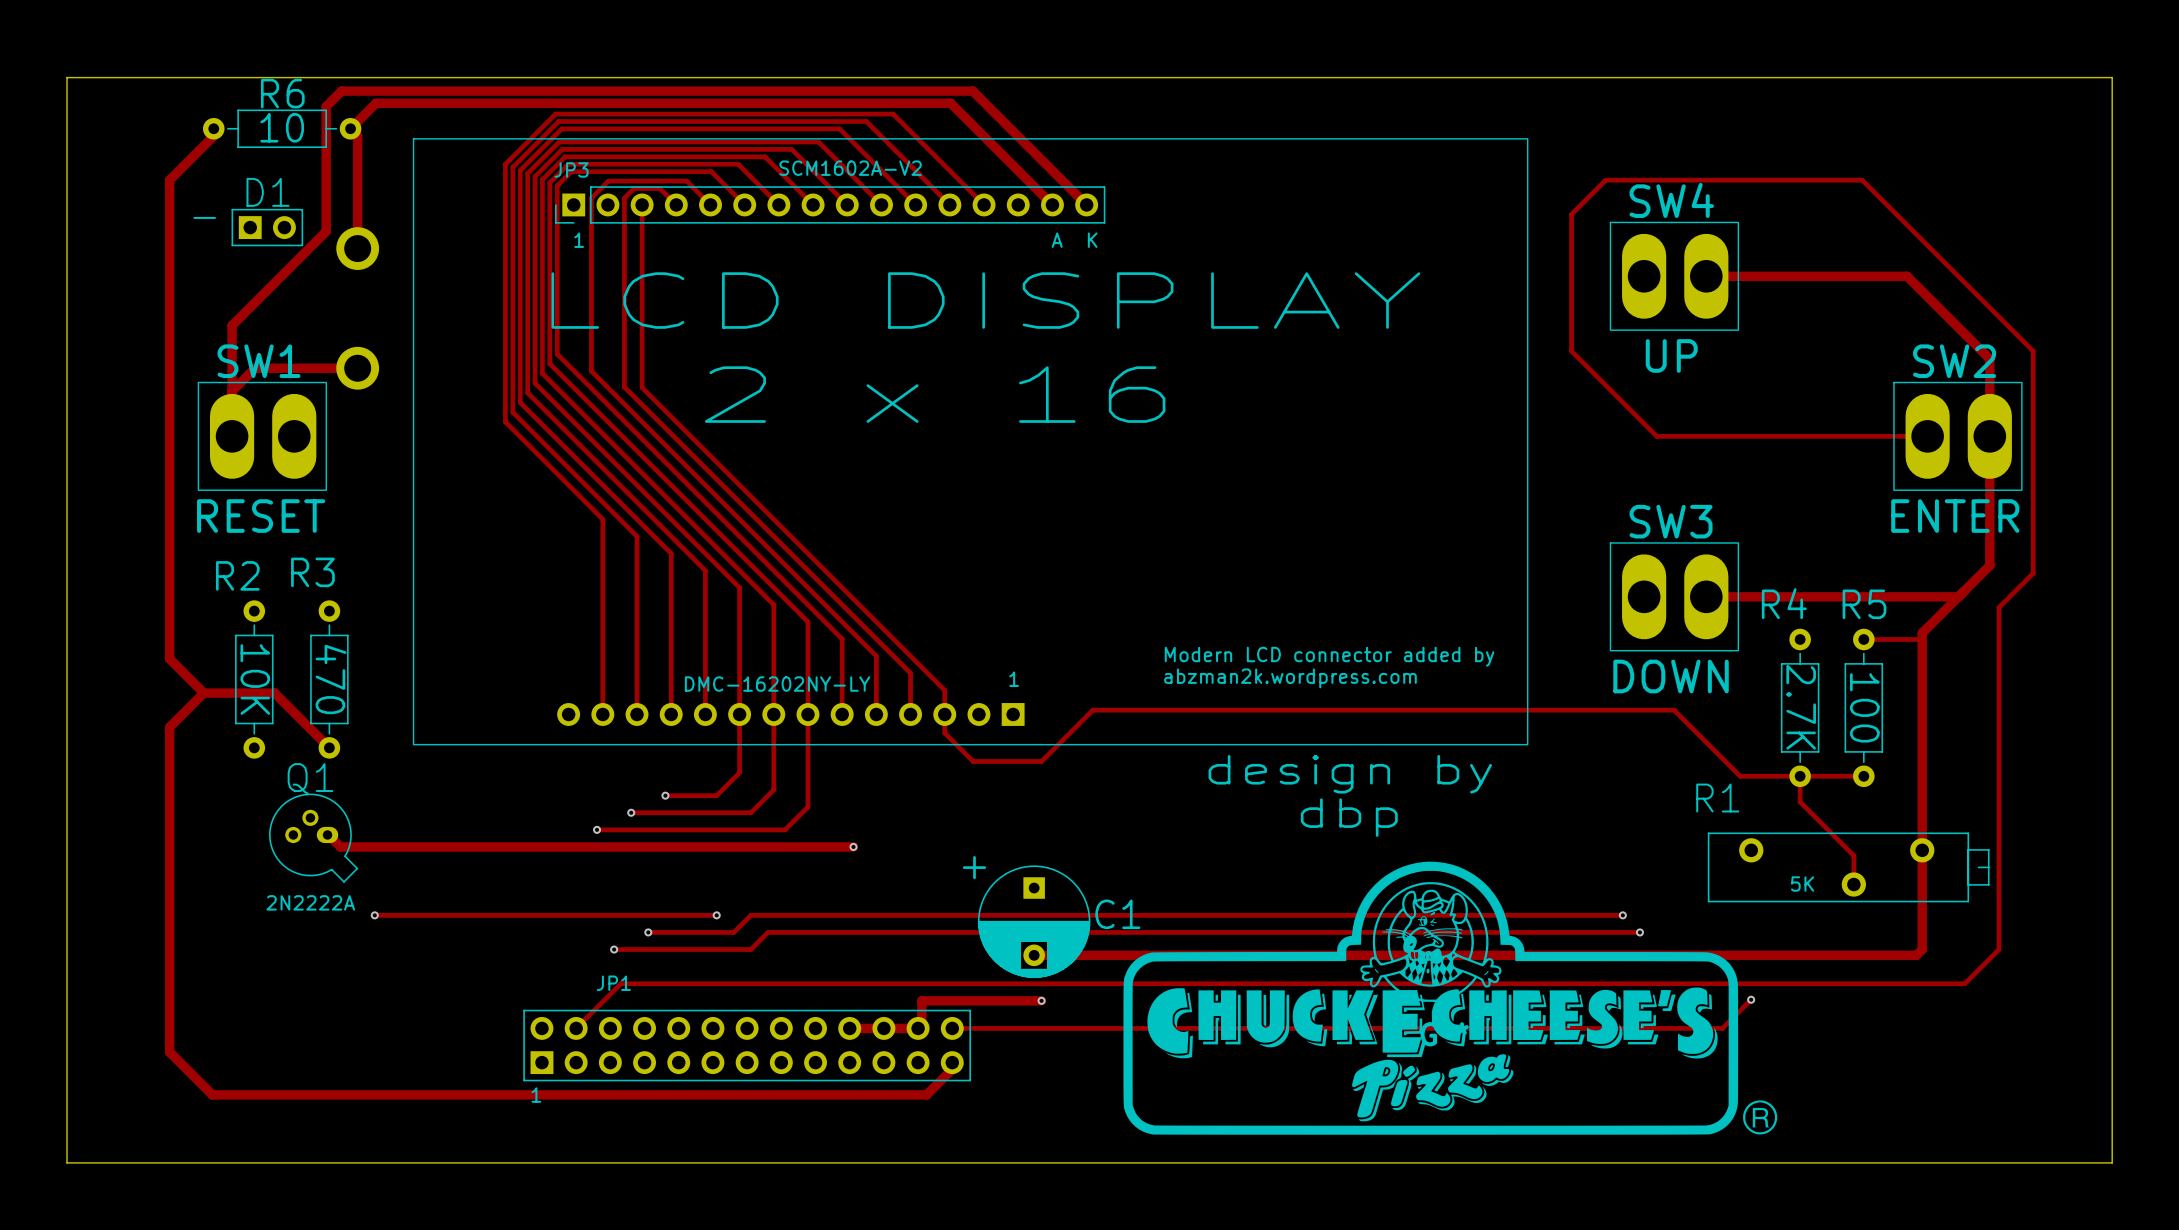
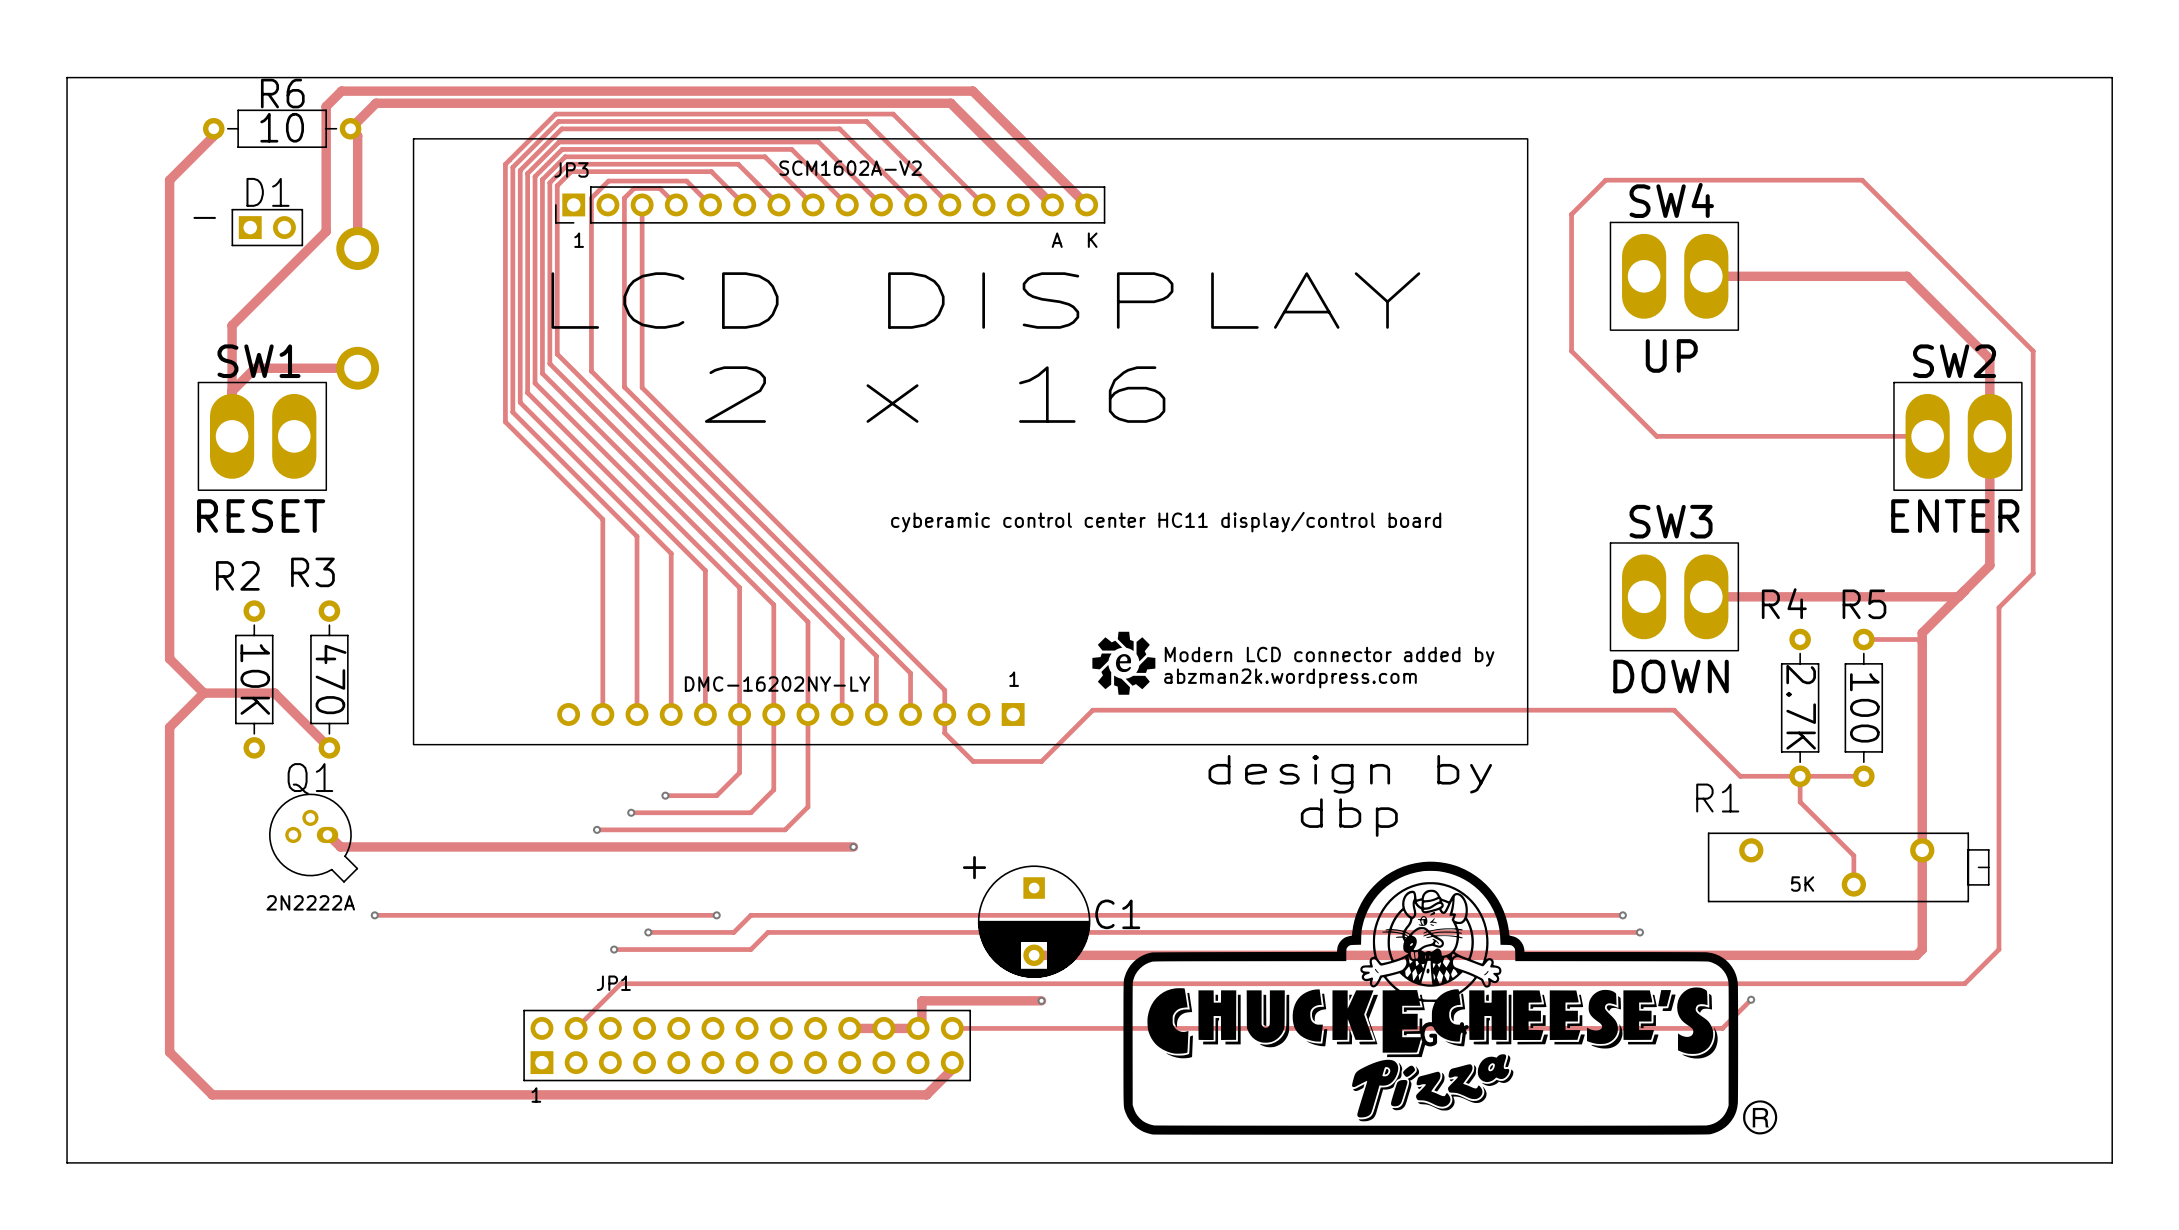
text: none -> cyberamic control center HC11 display/control board (1166, 522)
drawing: none -> [1092, 631, 1156, 695]

